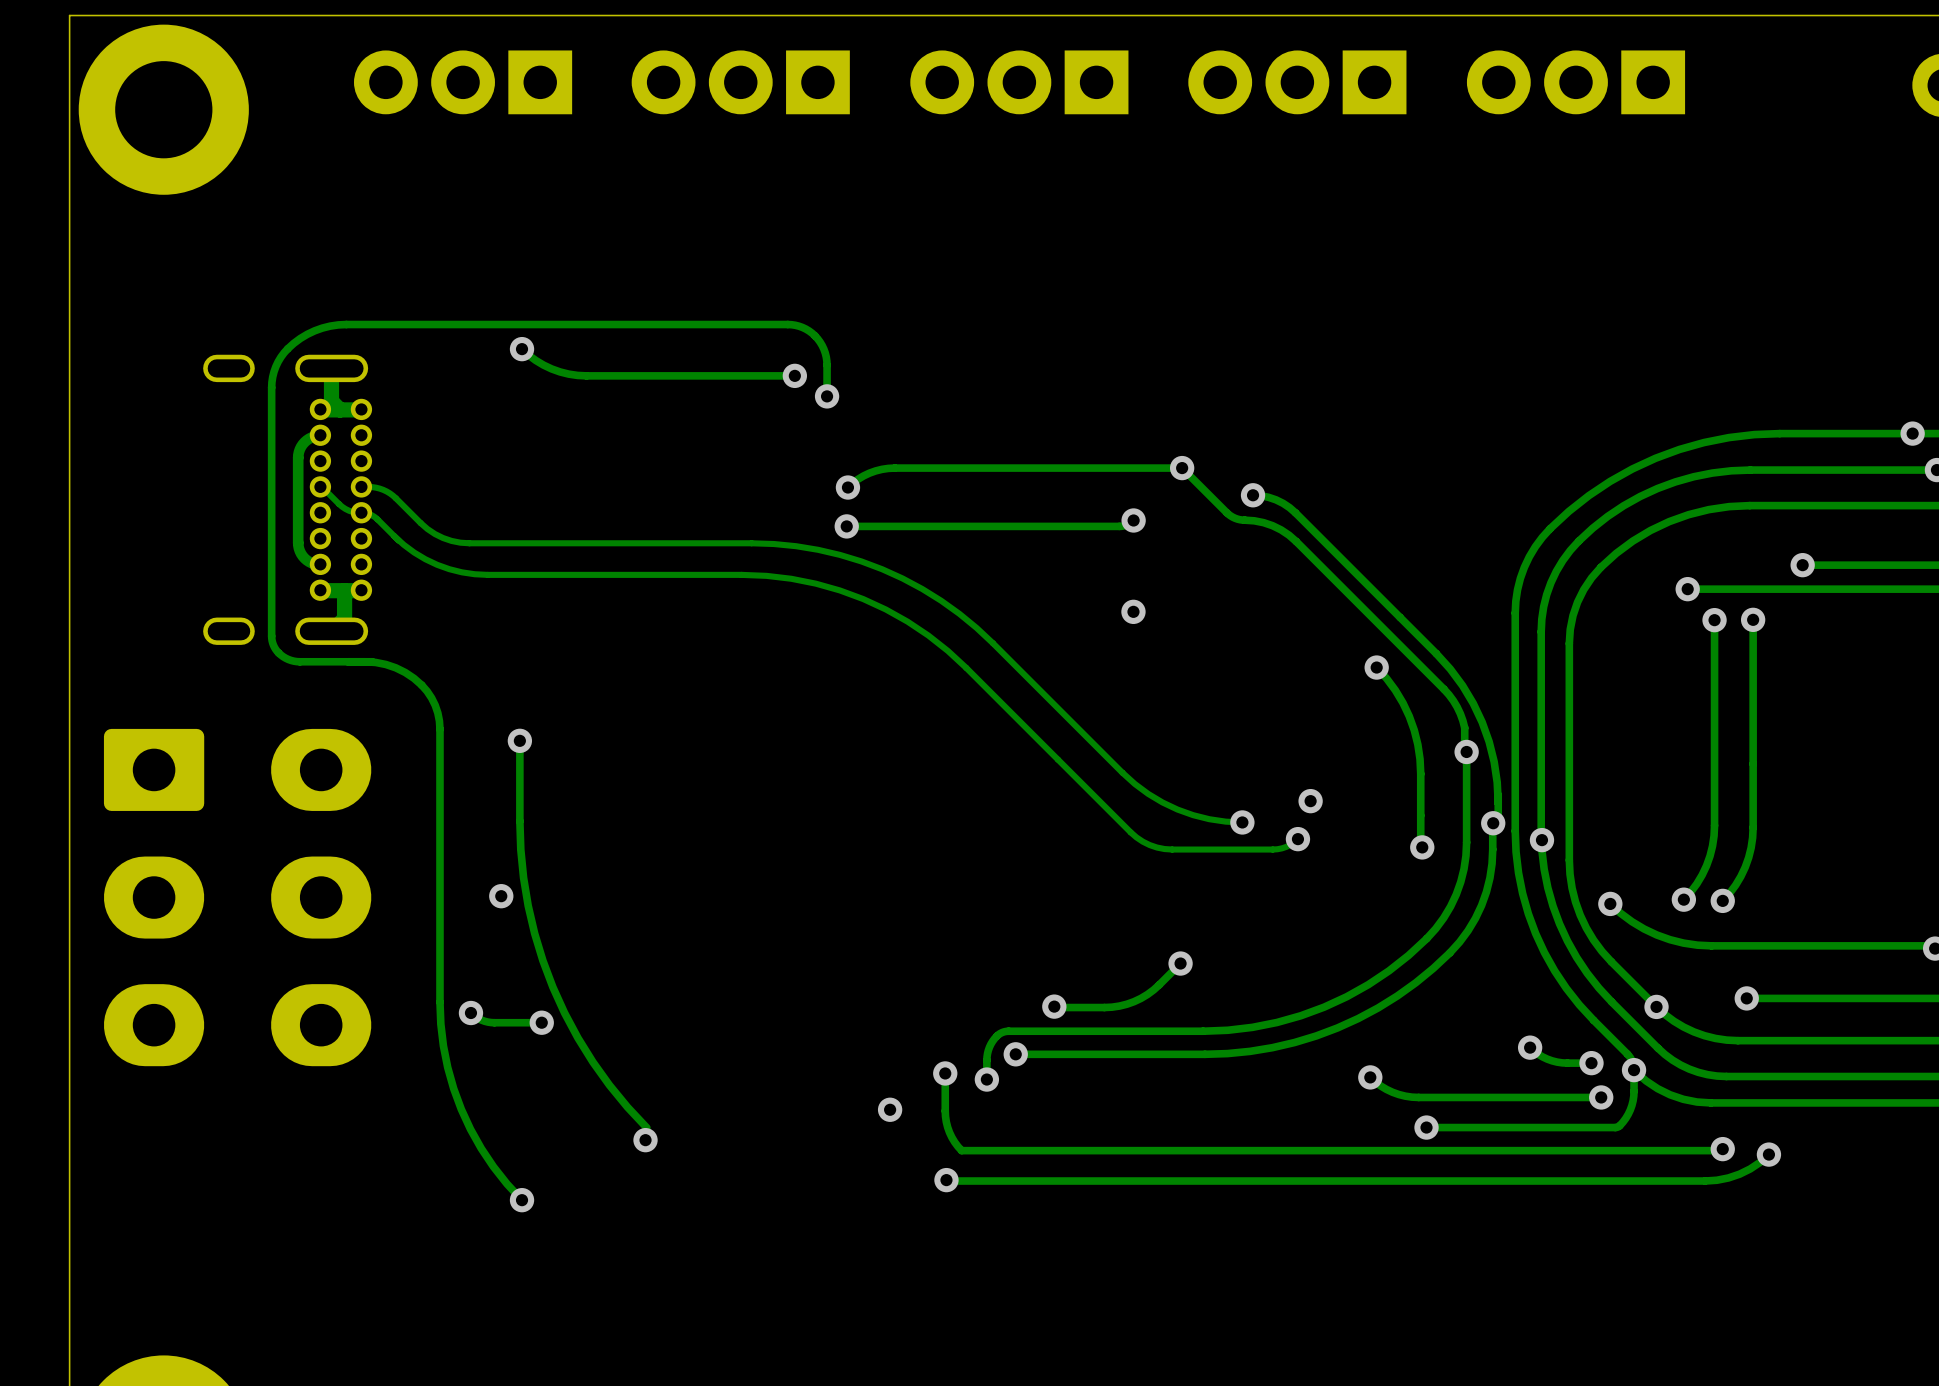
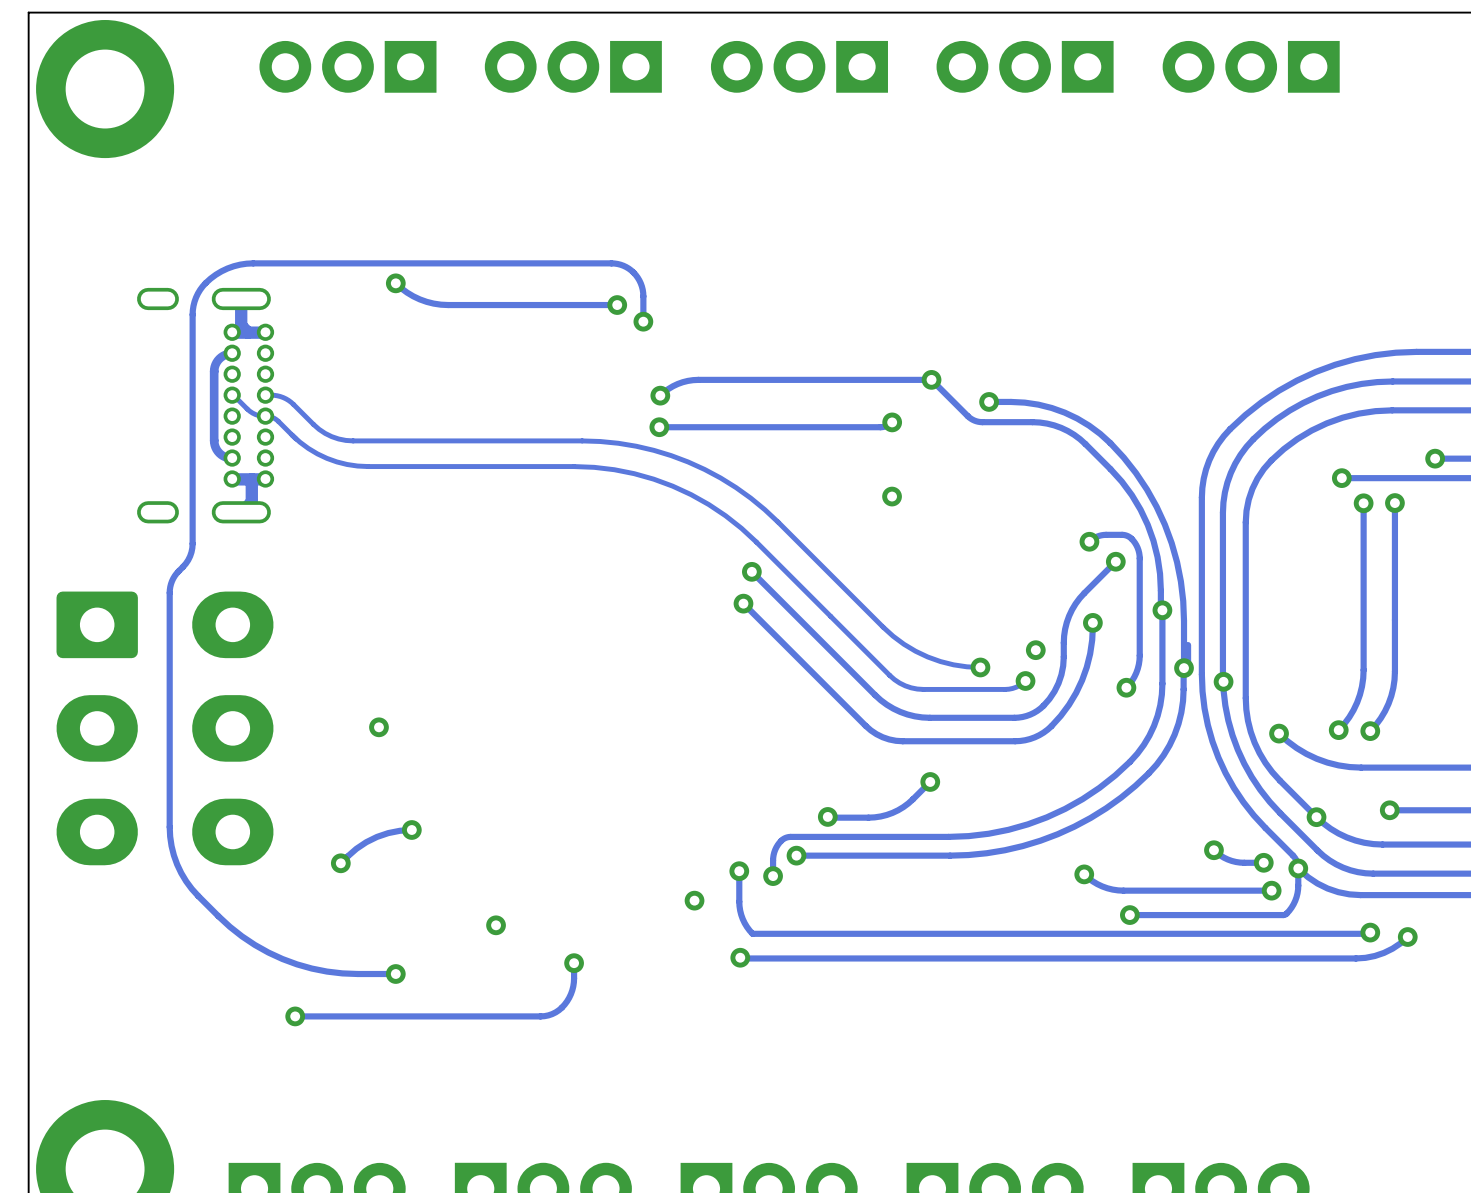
track: (1253, 495) (1276, 499) (1295, 512) (1450, 669) (1473, 703) (1489, 741) (1497, 782) (1498, 803) -> (989, 401) (1038, 404) (1077, 418) (1110, 443) (1136, 473) (1156, 506) (1171, 543) (1177, 562) (1183, 601) (1184, 668)
track: (1244, 520) (1272, 525) (1296, 541) (1443, 689) (1457, 707) (1464, 727) -> (982, 422) (1047, 423) (1067, 431) (1085, 444) (1121, 481) (1140, 509) (1147, 524) (1157, 557) (1160, 590)
track: (271, 636) (277, 651) (291, 660) (372, 661) -> none
track: (365, 661) (395, 667) (413, 678) (427, 691) (437, 713) (439, 729) (439, 1002) (443, 1045) (453, 1088) (470, 1129) (493, 1166) (522, 1200) -> (192, 516) (191, 552) (185, 563) (173, 578) (169, 592) (169, 827) (171, 846) (177, 864) (191, 888) (218, 916) (241, 936) (268, 952) (296, 964) (327, 971) (395, 974)
track: (1376, 667) (1402, 703) (1417, 744) (1420, 773) (1420, 843) -> (1089, 541) (1101, 535) (1124, 535) (1131, 538) (1138, 550) (1139, 660) (1134, 677) (1126, 687)
track: none -> (1115, 561) (1079, 598) (1069, 615) (1064, 635) (1063, 665) (1054, 691) (1037, 710) (1026, 716) (1014, 717) (922, 717) (893, 708) (875, 695) (751, 571)
via: none -> (1115, 561)
via: none -> (751, 571)
track: (519, 740) (519, 821) (523, 877) (534, 933) (542, 960) (552, 987) (577, 1038) (609, 1085) (646, 1127) -> none
via: (519, 740) -> none
track: none -> (743, 603) (870, 730) (889, 739) (902, 741) (1020, 740) (1043, 732) (1069, 704) (1082, 680) (1090, 653) (1092, 622)
via: none -> (743, 603)
via: none -> (1092, 622)
track: (470, 1013) (481, 1020) (491, 1022) (541, 1022) -> (340, 863) (356, 848) (376, 836) (388, 833) (411, 830)
via position: (470, 1013) -> (340, 863)
track: none -> (574, 963) (573, 982) (569, 997) (559, 1010) (544, 1016) (295, 1016)
via: none -> (574, 963)
via: none -> (295, 1016)

